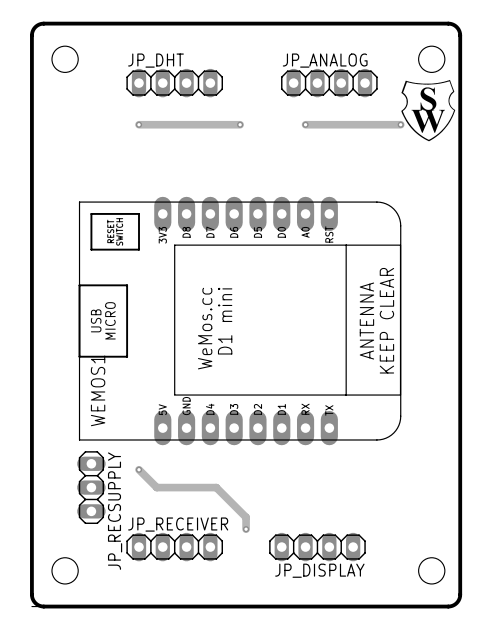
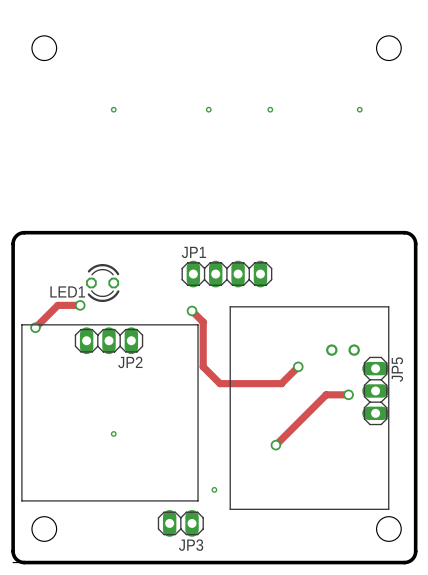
drawing: [401, 79, 456, 142] -> none
JP_DHT: (174, 83) -> none
JP_ANALOG: (329, 83) -> none
track: (139, 124) (240, 124) -> none
track: (305, 124) (400, 124) -> none
board edge: (31, 267) (31, 35) (35, 27) (43, 23) (448, 23) (454, 25) (458, 29) (460, 35) (460, 267) -> (13, 243) (16, 235) (24, 232) (404, 232) (412, 235) (415, 243)
JP1: none -> (226, 274)
LED1: none -> (102, 283)
WEMOS1: (239, 321) -> none
track: none -> (80, 305) (57, 305) (35, 327)
via: none -> (80, 305)
line: none -> (230, 306) (388, 306) (388, 509) (230, 509) (230, 306)
track: none -> (192, 310) (203, 322) (203, 366) (219, 383) (281, 383) (298, 366)
via: none -> (192, 310)
line: none -> (21, 324) (198, 324) (198, 500) (21, 500) (21, 324)
via: none -> (35, 327)
JP2: none -> (109, 340)
via: none -> (331, 350)
via: none -> (354, 350)
via: none -> (298, 366)
JP5: none -> (375, 390)
track: none -> (348, 394) (326, 394) (275, 445)
via: none -> (348, 394)
track: (139, 469) (156, 487) (216, 487) (246, 517) (246, 529) -> none
via: none -> (275, 445)
JP_RECSUPPLY: (91, 487) -> none
JP_RECEIVER: (174, 547) -> none
JP_DISPLAY: (317, 547) -> none
JP3: none -> (180, 523)

